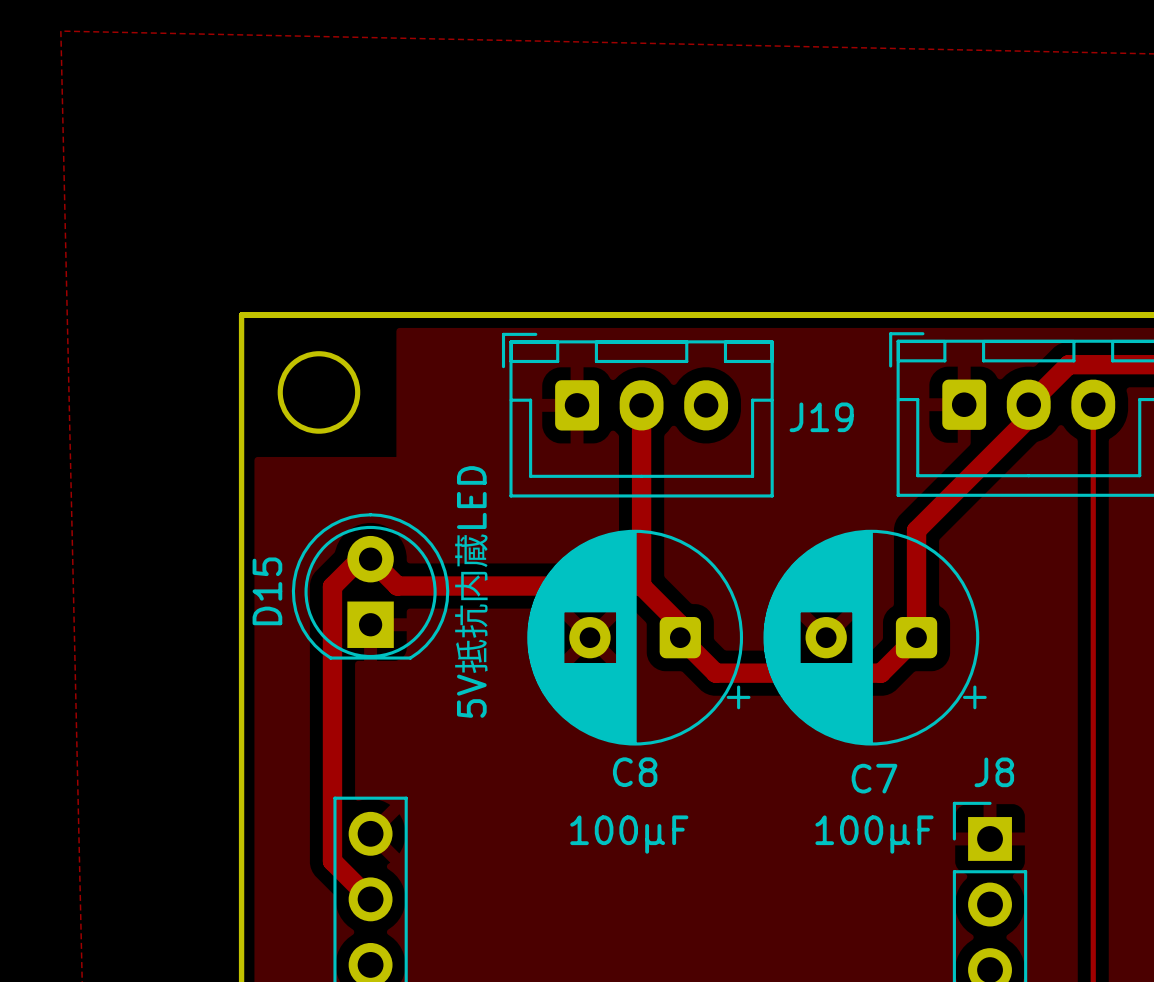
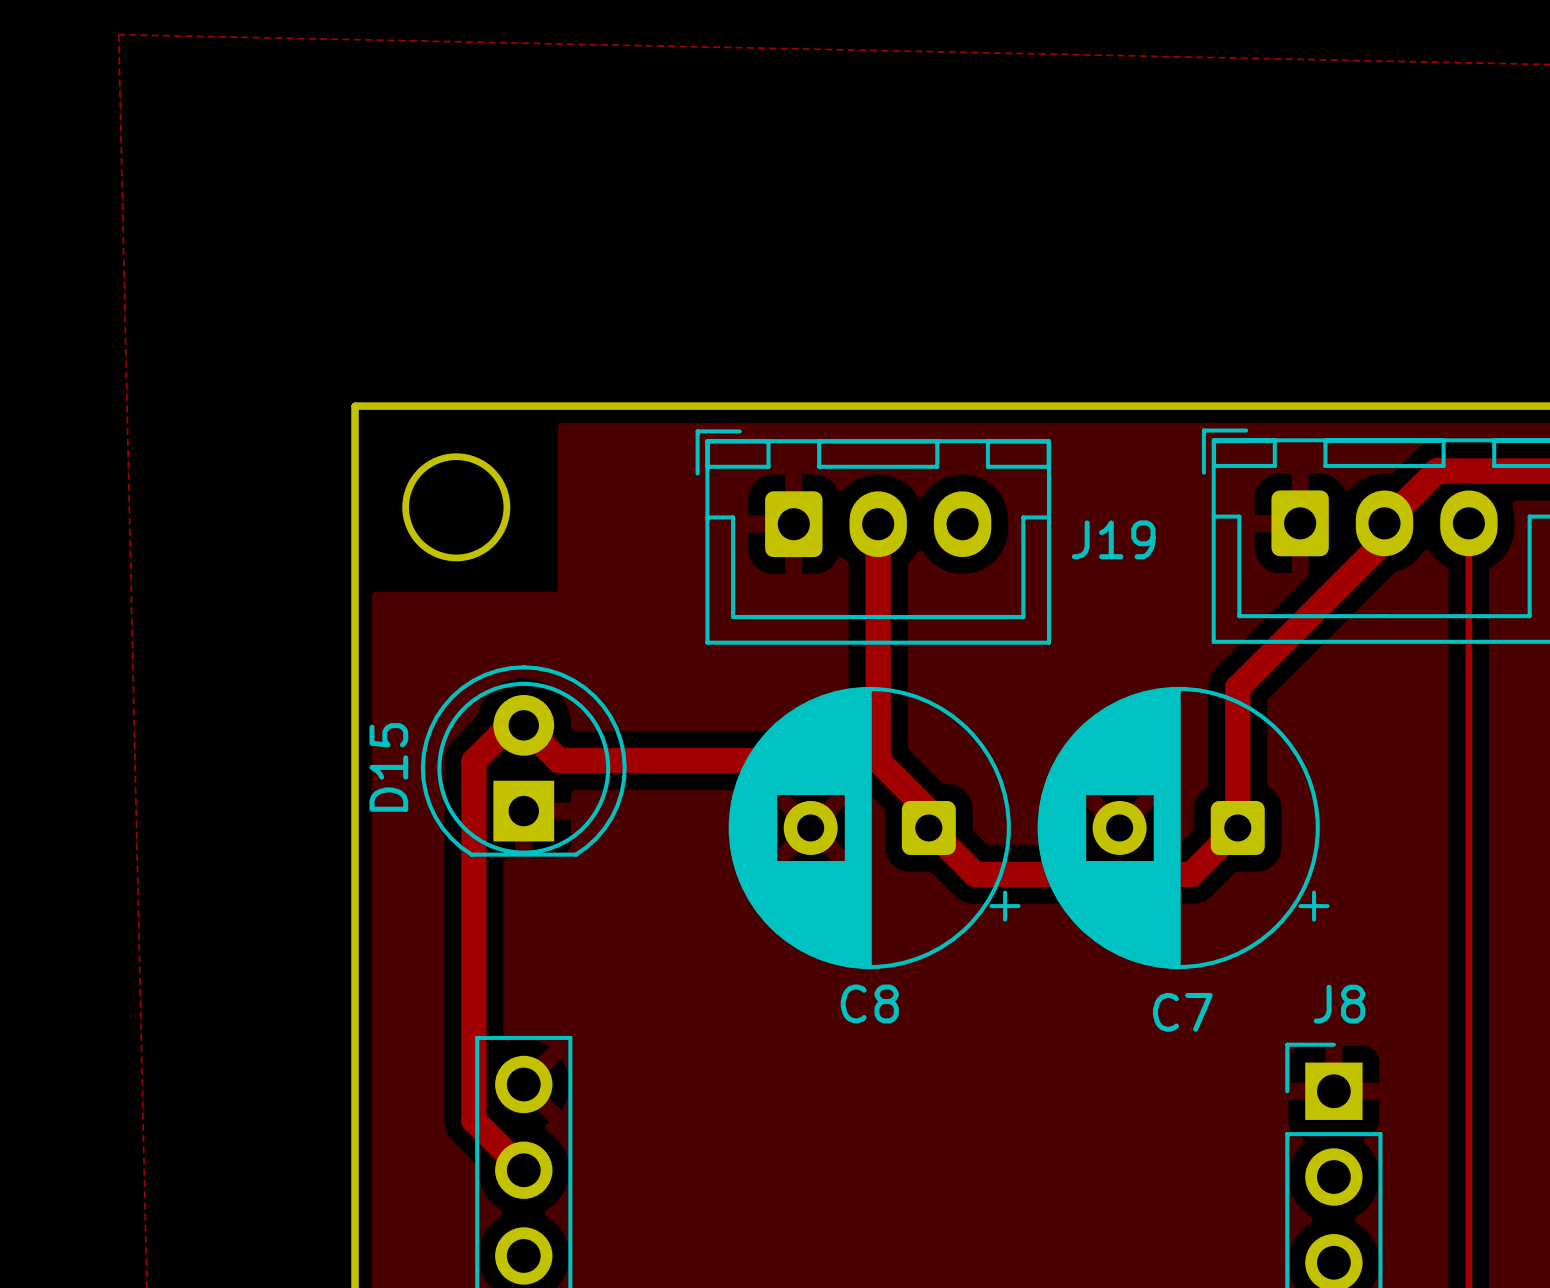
D15 value: 5V抵抗内蔵LED (471, 591) -> none
text: 100μF (629, 834) -> none
text: 100μF (874, 834) -> none

